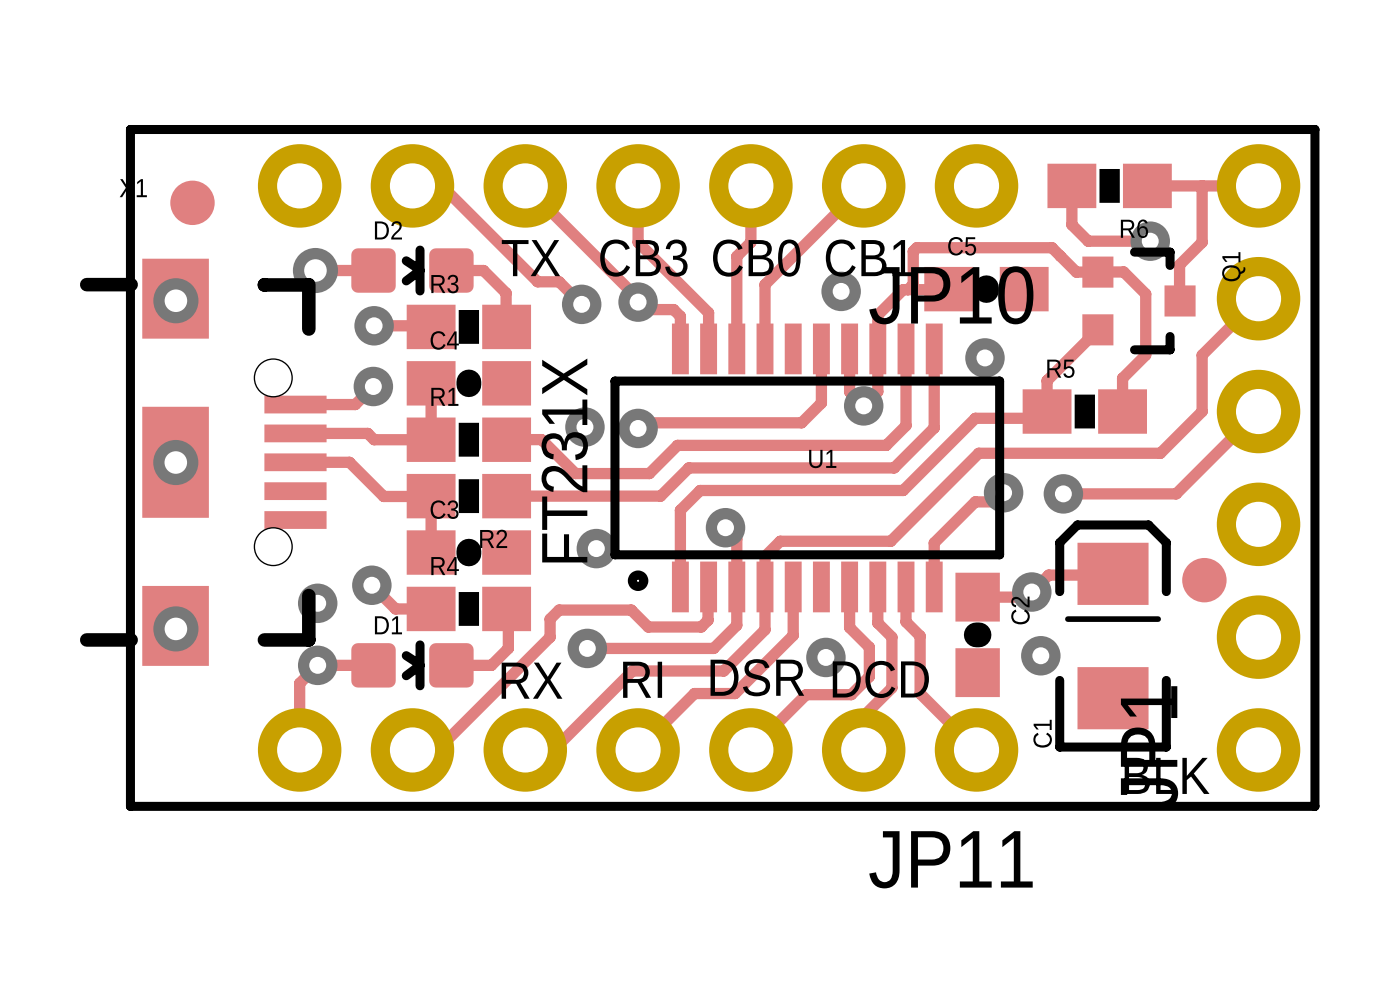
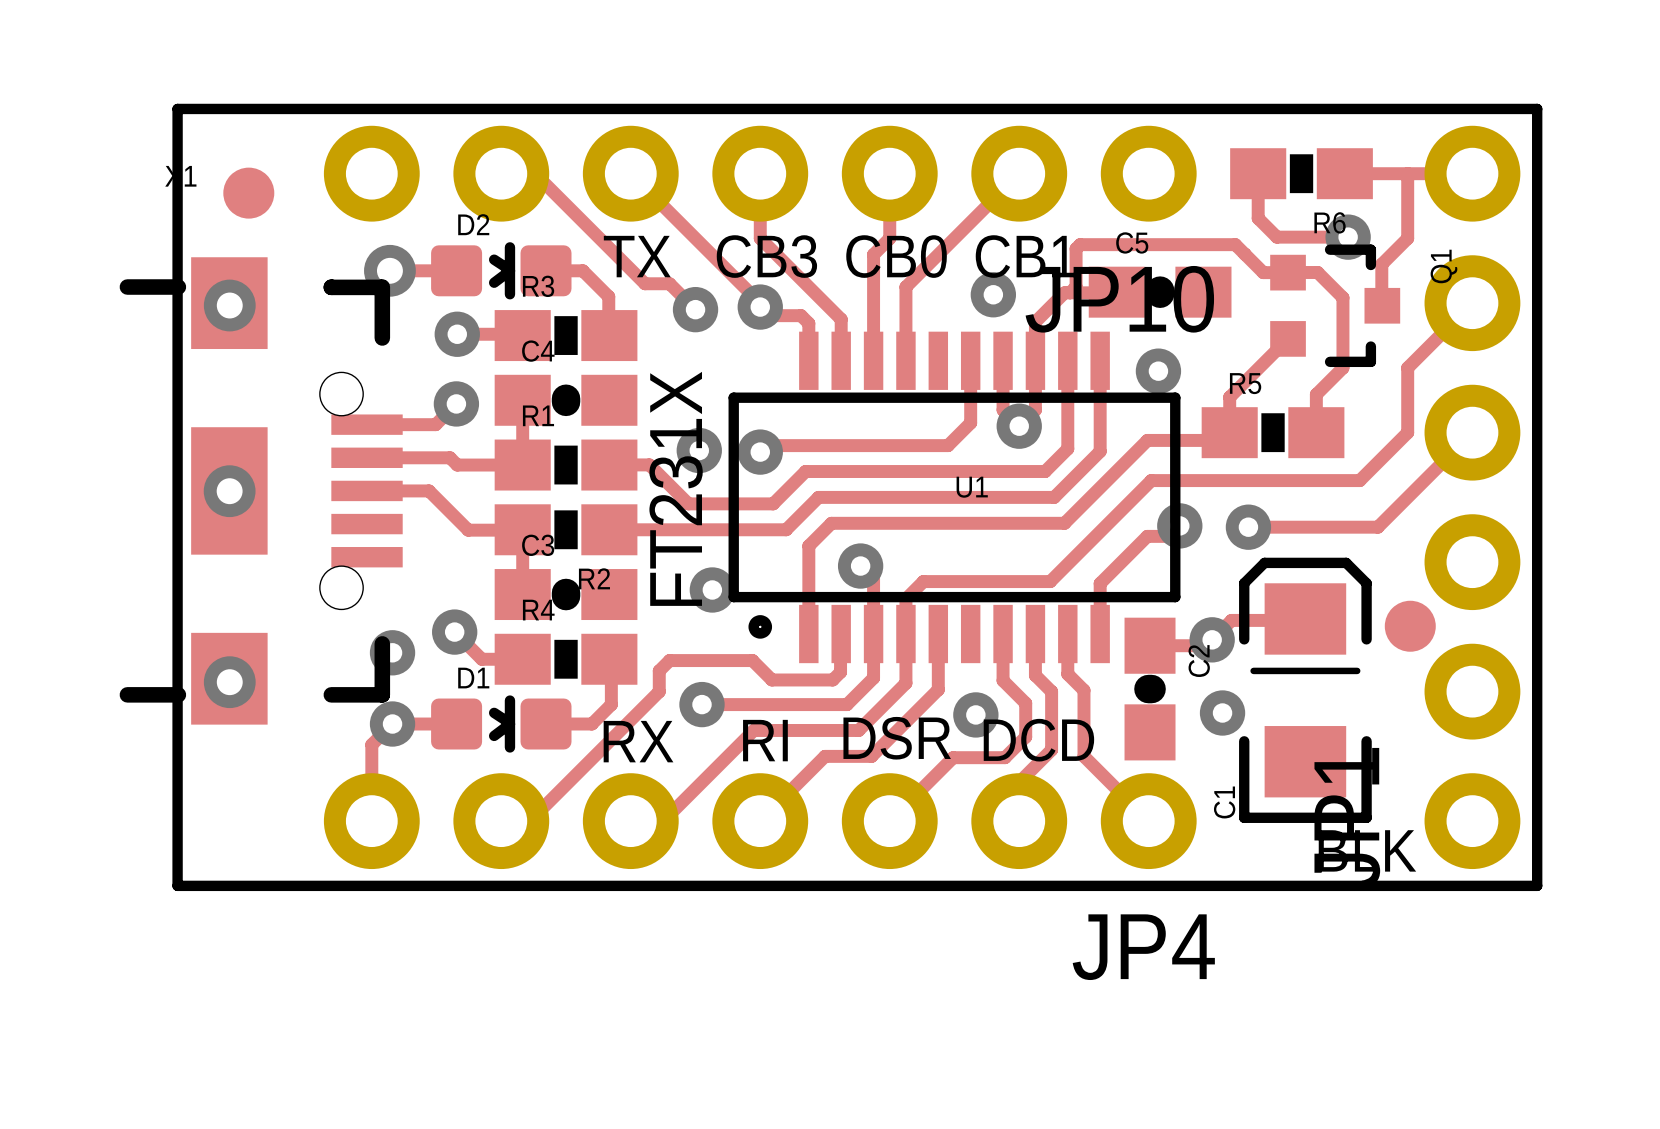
JP11 name: JP11 (950, 859) -> JP4 (1143, 947)

